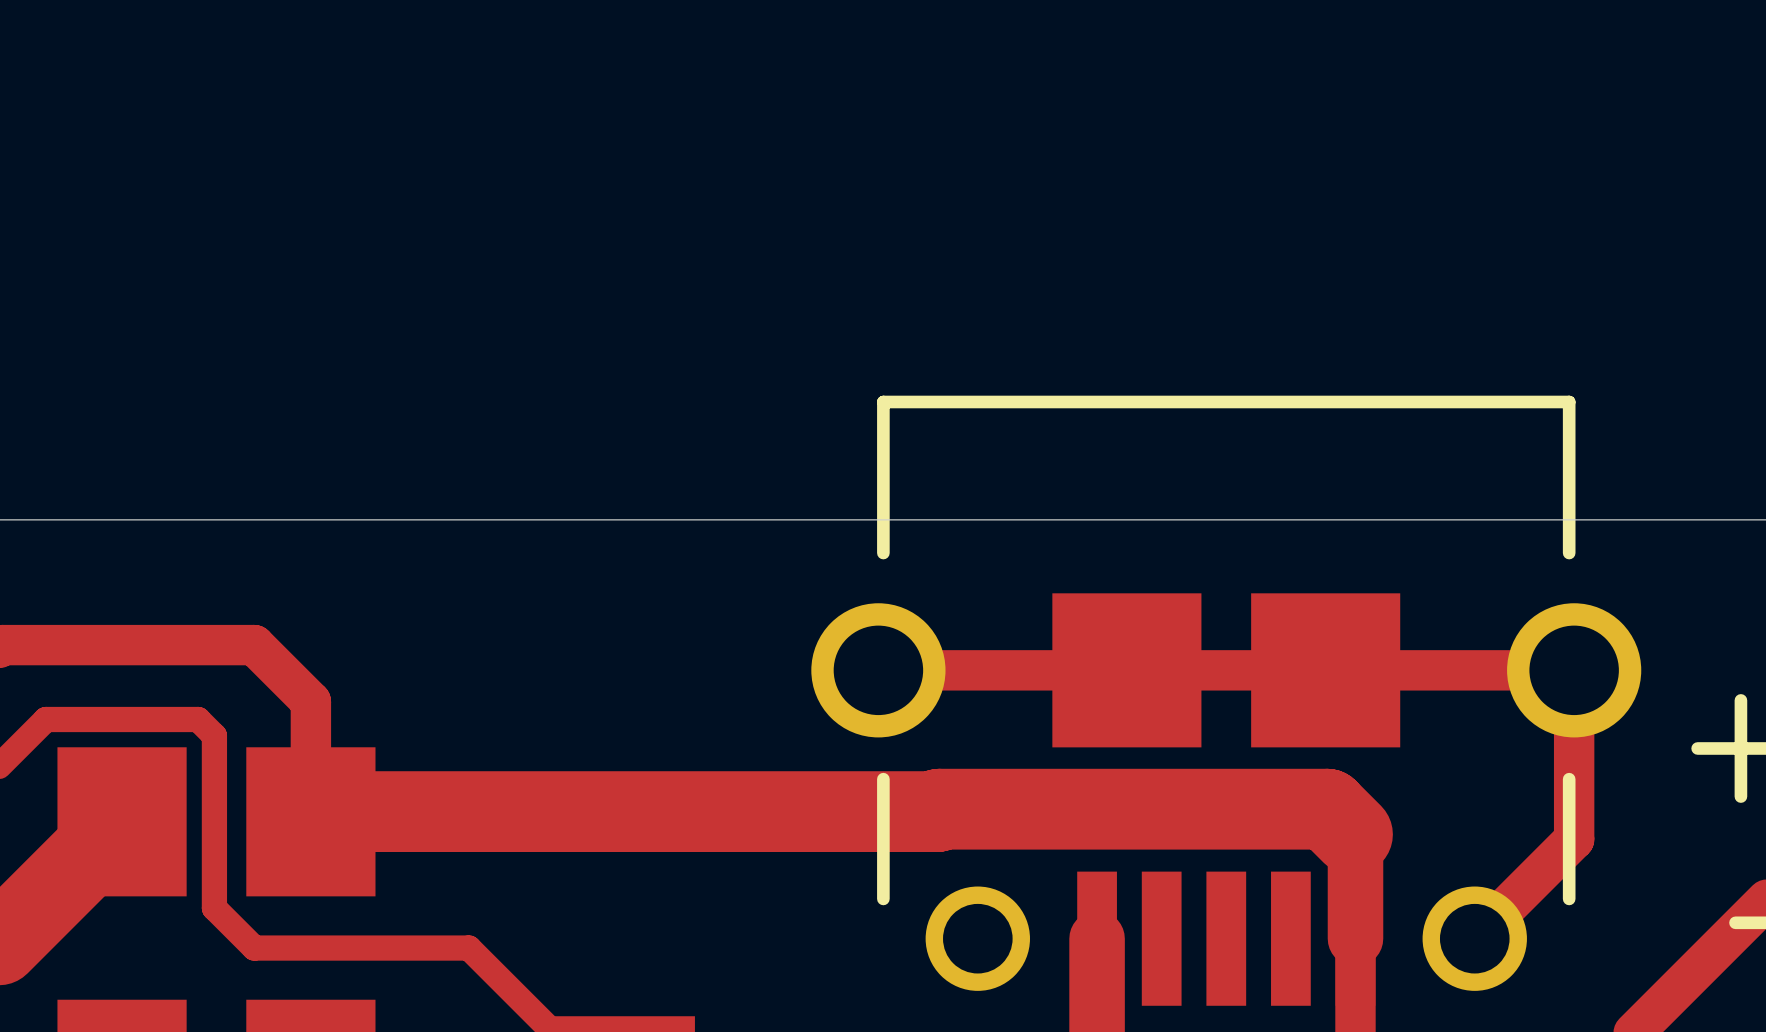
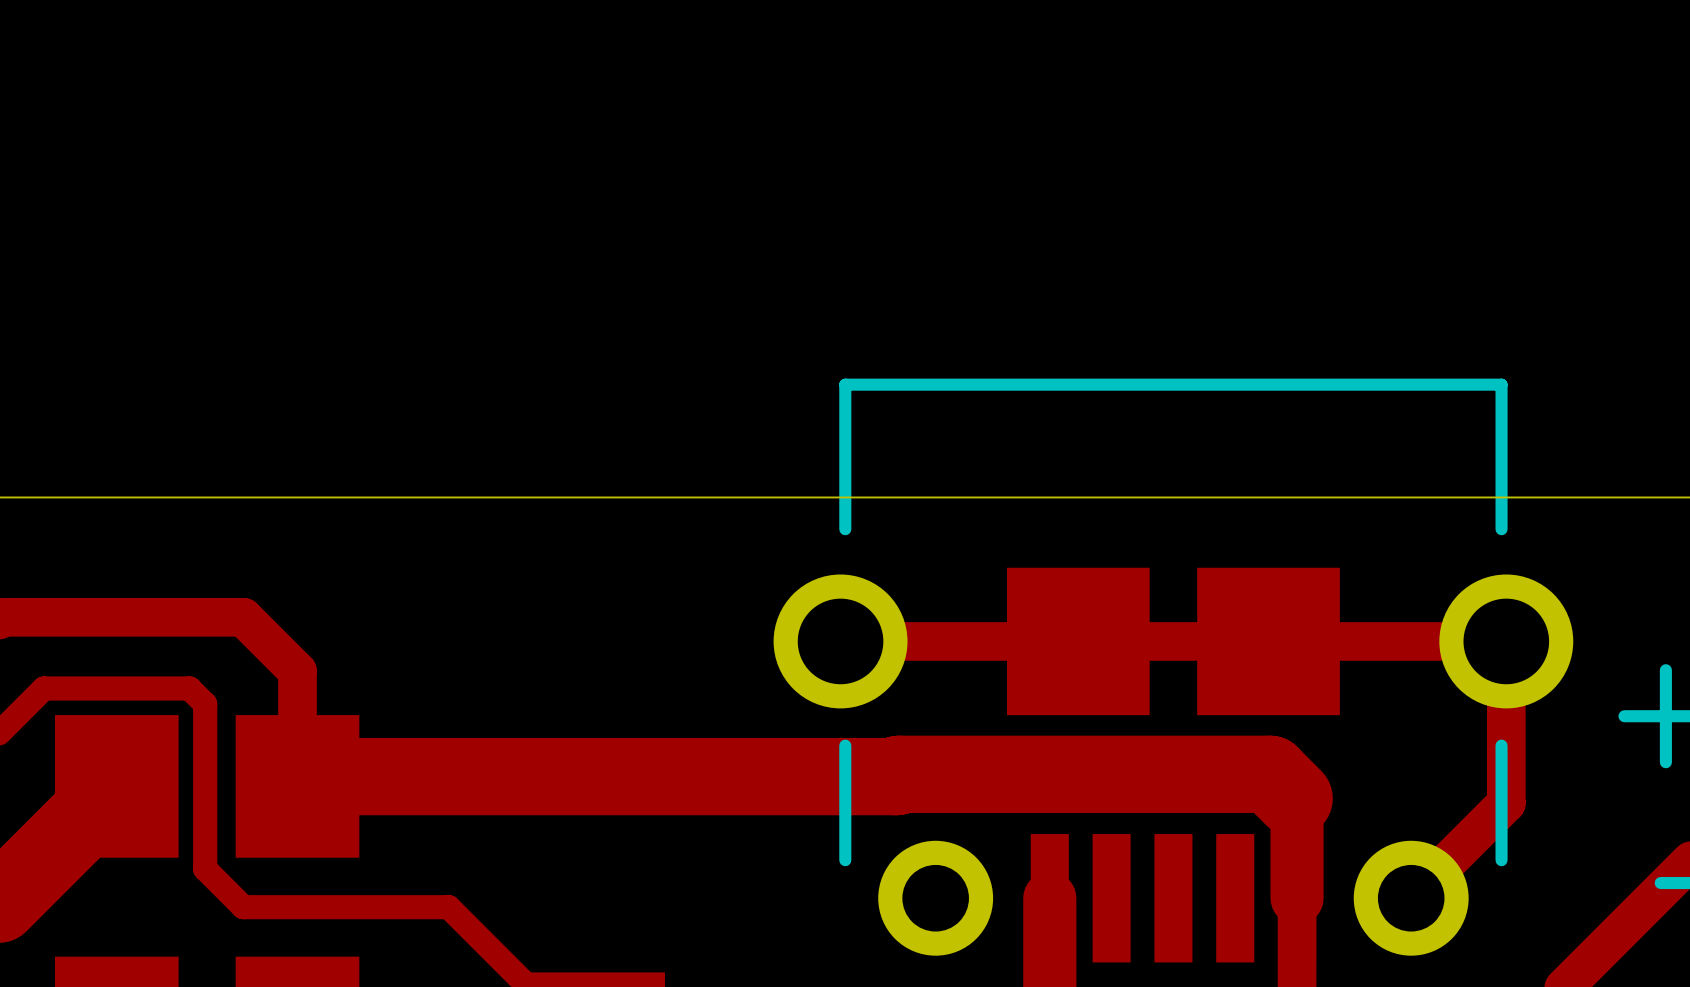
part footprint: [811, 395, 1642, 1006] -> [773, 378, 1574, 963]

